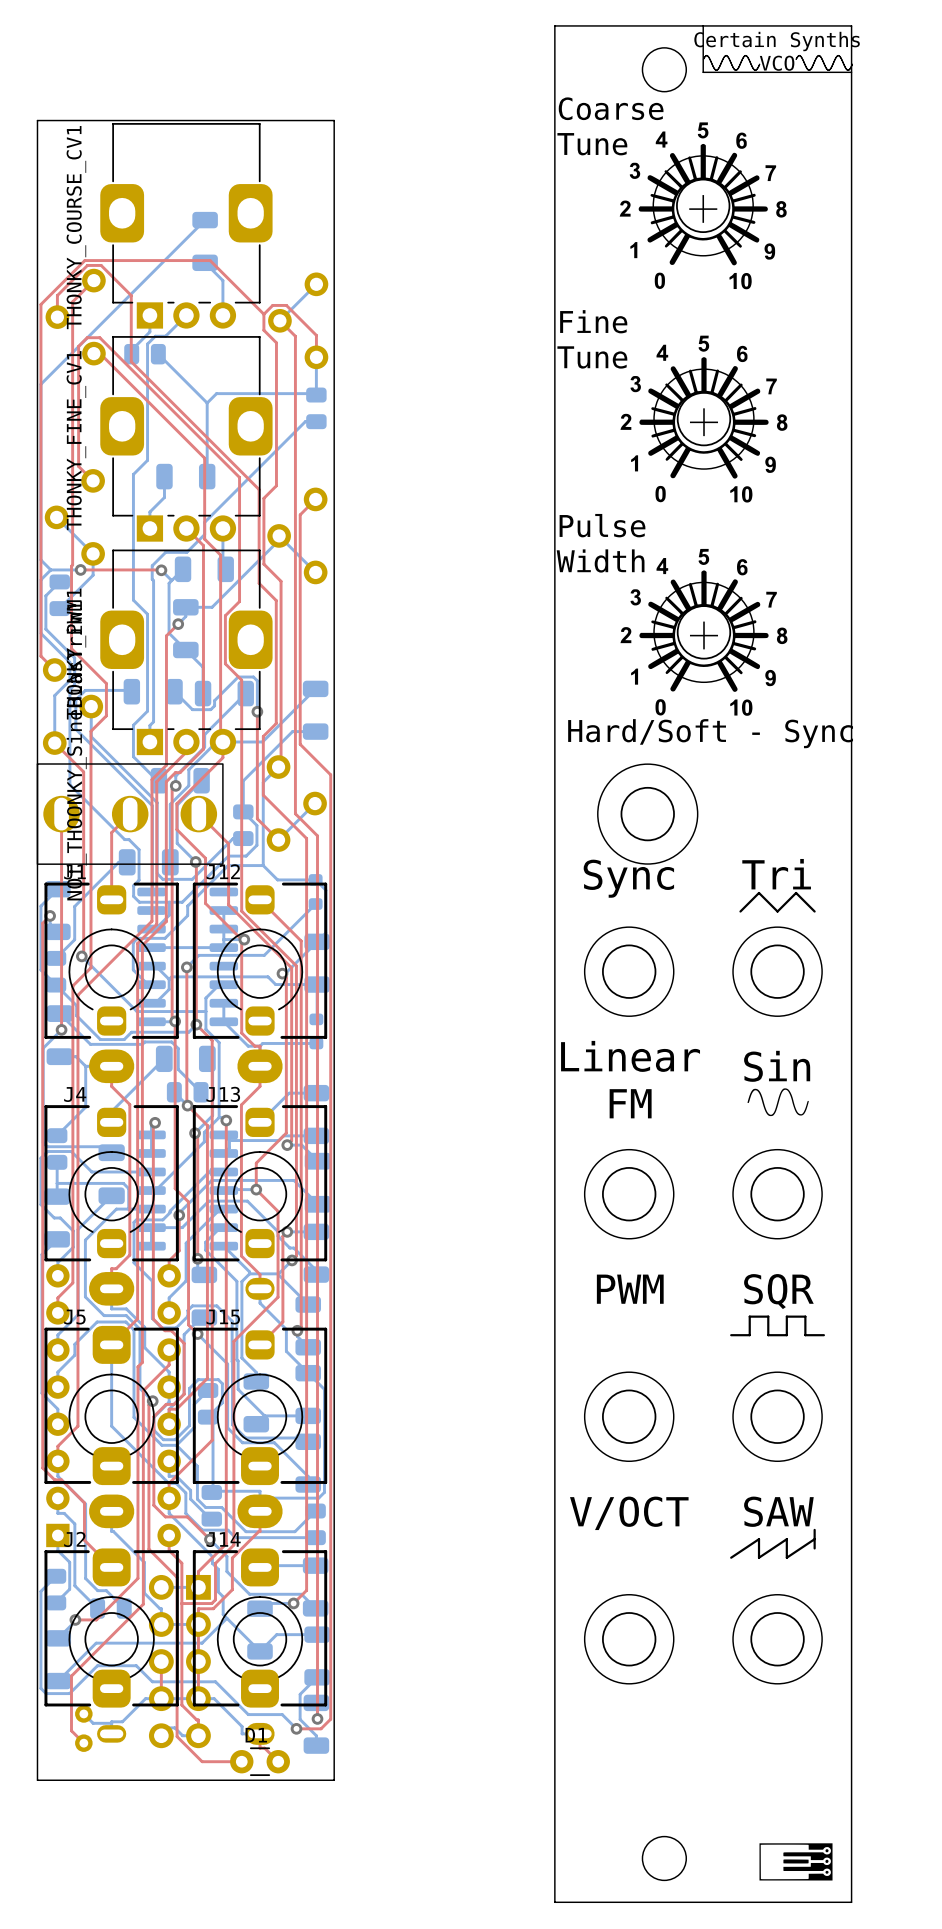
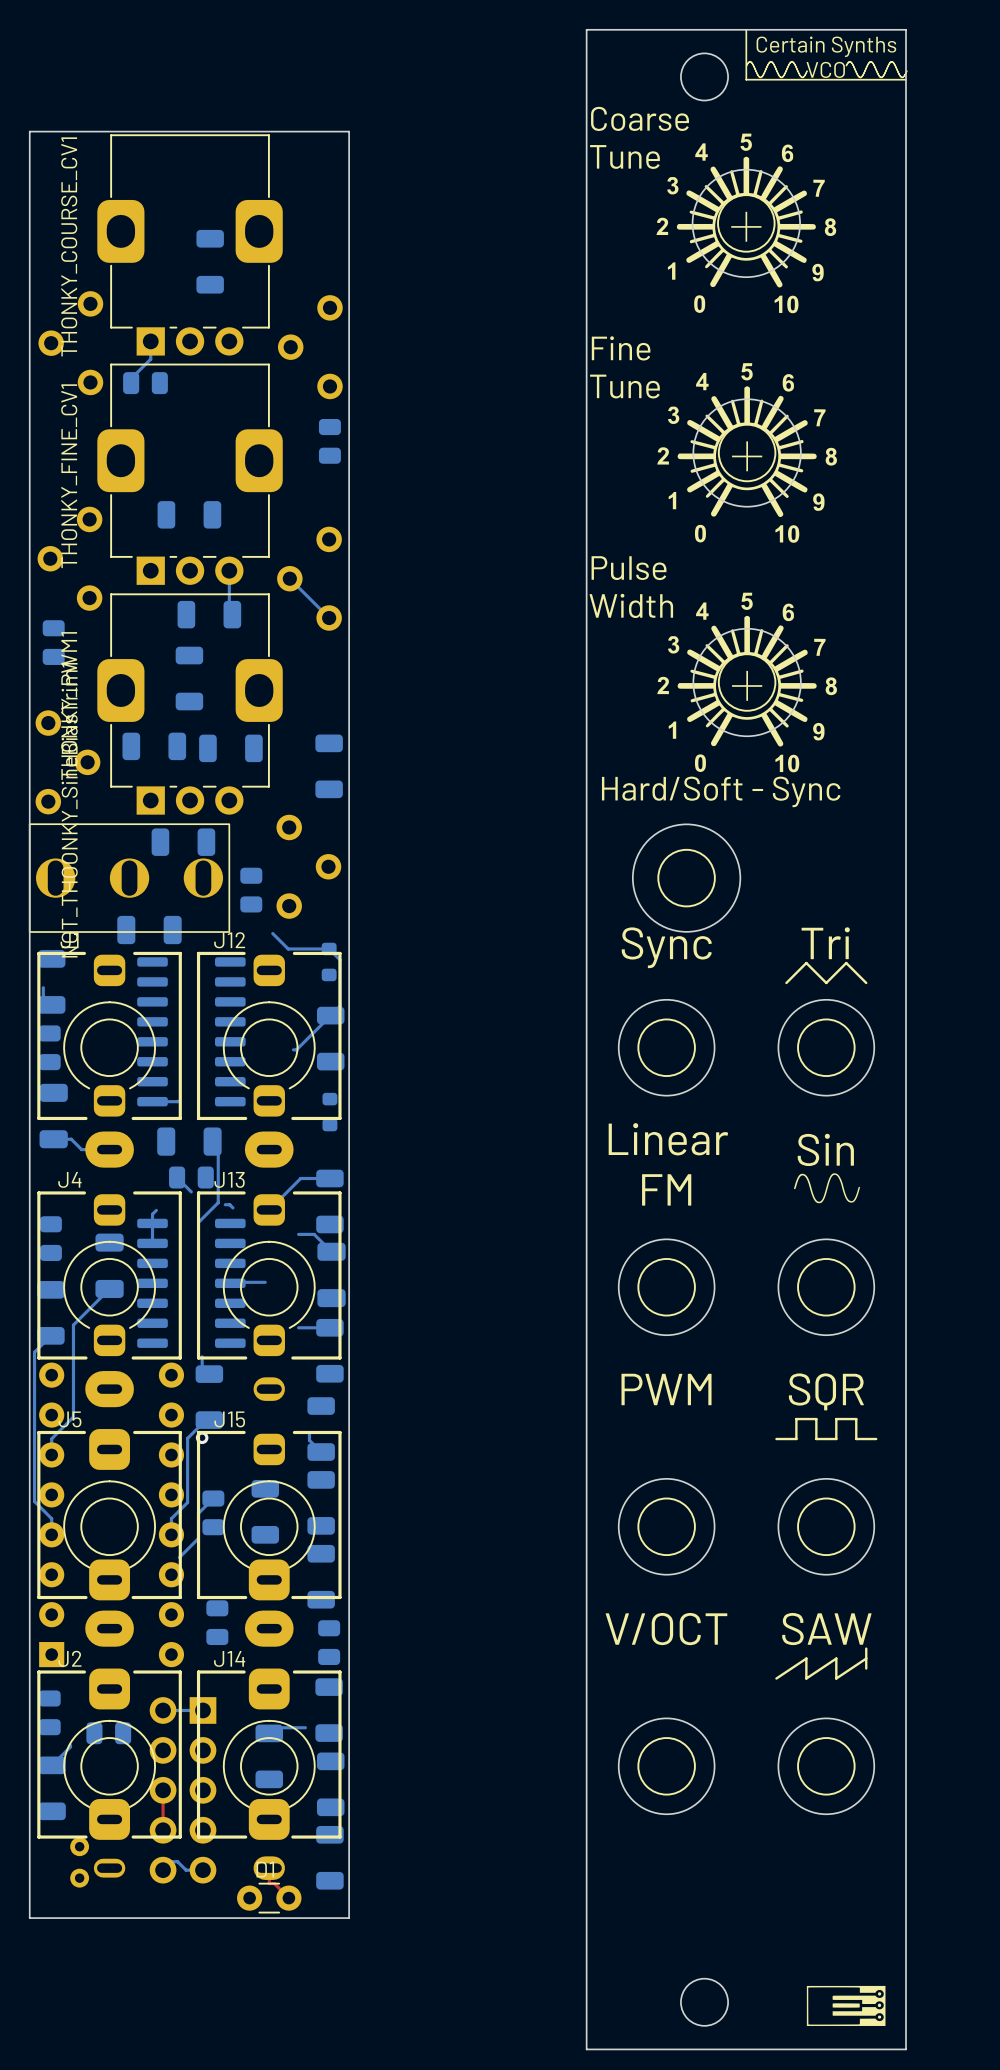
bottom track: (205, 220) (40, 384) (40, 560) (50, 569) -> none
bottom track: (205, 262) (222, 280) (222, 315) -> none
top track: (93, 280) (72, 301) (71, 648) (106, 683) (106, 715) (90, 731) (90, 967) (72, 985) (72, 1282) (57, 1297) (57, 1312) -> none
bottom track: (316, 284) (279, 320) -> none
top track: (263, 314) (263, 330) (276, 342) (276, 485) (263, 498) (263, 564) (281, 581) (281, 764) (278, 767) -> none
top track: (263, 314) (210, 260) (84, 260) (40, 304) (40, 656) (54, 670) -> none
top track: (263, 314) (272, 305) (286, 305) (316, 335) (316, 357) -> none
bottom track: (186, 315) (165, 336) (155, 336) (147, 344) (147, 460) (133, 474) (133, 600) (147, 614) (147, 711) (133, 725) (133, 756) (158, 780) -> none
top track: (57, 317) (57, 295) (87, 265) (101, 265) (131, 295) (131, 361) (259, 489) (259, 583) (276, 600) (276, 723) (263, 736) (263, 795) (306, 838) (306, 1590) (293, 1603) -> none
top track: (279, 320) (295, 336) (295, 813) (317, 835) (317, 1718) -> none
top track: (93, 353) (100, 353) (204, 458) (204, 539) (220, 555) (220, 739) (222, 741) (222, 757) (176, 803) (176, 829) (205, 858) (205, 903) (241, 939) -> none
bottom track: (158, 354) (207, 403) -> none
bottom track: (316, 357) (316, 395) -> none
bottom track: (316, 393) (216, 393) (207, 403) -> none
bottom track: (207, 403) (207, 476) -> none
bottom track: (316, 421) (305, 421) (204, 522) (204, 534) (186, 552) (165, 552) (152, 565) (153, 721) (149, 725) (149, 741) -> none
bottom track: (164, 476) (164, 497) (149, 512) (149, 528) -> none
top track: (93, 480) (78, 466) (78, 346) (87, 337) (99, 337) (239, 477) (239, 601) (225, 615) (225, 663) (241, 680) (241, 911) (296, 965) (296, 1256) (292, 1260) -> none
top track: (315, 499) (300, 514) (300, 744) (330, 774) (330, 1719) (321, 1728) (296, 1728) -> none
bottom track: (56, 517) (93, 553) (93, 575) (59, 608) -> none
top track: (186, 528) (203, 545) (203, 749) (180, 772) (175, 772) (166, 781) (166, 921) (142, 945) (142, 1362) (137, 1366) (137, 1578) (96, 1619) (75, 1619) -> none
bottom track: (279, 535) (279, 540) (212, 607) (185, 607) (185, 616) (178, 624) -> none
bottom track: (50, 569) (80, 569) -> none
bottom track: (50, 569) (41, 579) (41, 633) (69, 662) (69, 680) (54, 695) (54, 743) -> none
top track: (80, 569) (161, 570) -> none
via: (80, 569) -> none
bottom track: (183, 569) (169, 583) (169, 633) (203, 667) (203, 693) -> none
bottom track: (161, 570) (171, 580) -> none
via: (161, 570) -> none
bottom track: (59, 581) (45, 595) (45, 629) (74, 658) (74, 684) (69, 689) (69, 784) (124, 839) (129, 839) (139, 849) (139, 880) (133, 885) (133, 896) (139, 902) (182, 902) (228, 856) (246, 856) (256, 845) (256, 825) (243, 811) (243, 780) (292, 731) (315, 731) -> none
top track: (178, 624) (166, 635) (166, 765) (151, 779) (151, 921) (77, 995) (77, 1426) (57, 1446) (57, 1461) -> none
via: (178, 624) -> none
bottom track: (315, 688) (262, 741) (216, 741) (188, 769) (188, 785) (170, 804) (170, 862) -> none
bottom track: (131, 691) (85, 690) (75, 699) (75, 729) (152, 805) (151, 891) -> none
bottom track: (174, 691) (192, 709) (210, 709) (214, 705) (214, 700) (238, 677) (253, 677) (257, 680) (257, 711) -> none
bottom track: (245, 693) (204, 734) (204, 747) (175, 776) (175, 785) -> none
bottom track: (91, 706) (91, 736) (157, 802) (157, 873) (162, 879) (192, 879) (233, 838) (243, 838) -> none
top track: (257, 711) (257, 818) (278, 840) -> none
via: (257, 711) -> none
top track: (186, 741) (186, 752) (156, 781) (156, 924) (137, 943) (137, 1318) (111, 1344) -> none
top track: (54, 743) (83, 771) (83, 954) (81, 956) -> none
bottom track: (278, 767) (263, 782) (263, 865) (228, 865) (187, 906) (187, 915) (165, 938) (137, 938) (133, 942) (133, 969) (148, 984) (151, 984) -> none
bottom track: (201, 780) (177, 805) (177, 843) (195, 861) -> none
top track: (175, 785) (172, 789) (172, 1018) (175, 1021) (175, 1188) (188, 1202) (188, 1324) (197, 1334) -> none
via: (175, 785) -> none
bottom track: (315, 803) (278, 840) -> none
top track: (61, 814) (61, 1029) -> none
top track: (130, 814) (111, 832) (111, 899) -> none
top track: (198, 814) (228, 843) (228, 904) (291, 967) (291, 1140) (287, 1145) -> none
top track: (195, 861) (196, 1024) (212, 1040) (212, 1440) (169, 1483) (169, 1498) -> none
via: (195, 861) -> none
bottom track: (127, 862) (118, 862) (74, 906) (74, 939) (56, 958) -> none
bottom track: (57, 889) (40, 906) (40, 969) (76, 1005) (76, 1015) (100, 1039) (124, 1039) (131, 1032) (188, 1032) (196, 1024) -> none
top track: (260, 899) (301, 941) (301, 1326) (297, 1330) -> none
bottom track: (169, 902) (169, 915) (155, 929) (151, 929) -> none
bottom track: (315, 904) (264, 955) (198, 955) (186, 967) -> none
bottom track: (223, 910) (223, 947) (151, 947) -> none
top track: (50, 915) (42, 923) (42, 1468) (54, 1479) (61, 1479) (84, 1502) (84, 1540) (111, 1567) -> none
via: (50, 915) -> none
bottom track: (223, 939) (244, 939) -> none
top track: (241, 939) (241, 1033) (254, 1046) (260, 1046) (260, 1086) (241, 1104) (241, 1256) (260, 1274) (260, 1288) -> none
via: (244, 939) -> none
bottom track: (81, 956) (136, 1011) (205, 1011) -> none
via: (81, 956) -> none
bottom track: (151, 966) (155, 966) (169, 979) -> none
top track: (186, 967) (186, 1104) (207, 1125) (207, 1378) (176, 1409) (169, 1409) (169, 1424) -> none
via: (186, 967) -> none
top track: (282, 973) (286, 977) (286, 1133) (256, 1163) (256, 1189) (278, 1211) (278, 1297) (233, 1341) (233, 1544) (215, 1563) (215, 1599) (211, 1603) (181, 1603) -> none
via: (282, 973) -> none
bottom track: (169, 979) (169, 989) (155, 1003) (151, 1003) -> none
bottom track: (169, 979) (171, 976) (268, 976) (275, 984) (317, 984) (316, 1019) -> none
bottom track: (223, 984) (219, 984) (205, 998) (205, 1029) (219, 1042) (219, 1117) (204, 1132) (204, 1141) (155, 1190) (151, 1190) -> none
bottom track: (223, 1003) (223, 1021) (248, 1046) (260, 1046) -> none
bottom track: (59, 1013) (90, 1044) (142, 1044) (144, 1041) (171, 1041) (178, 1048) (178, 1069) (201, 1092) -> none
via: (175, 1021) -> none
via: (196, 1024) -> none
bottom track: (61, 1029) (43, 1048) (43, 1142) (47, 1146) (105, 1146) (111, 1152) -> none
via: (61, 1029) -> none
bottom track: (316, 1043) (262, 1043) (260, 1046) -> none
bottom track: (164, 1058) (111, 1111) (111, 1122) -> none
bottom track: (85, 1066) (85, 1107) (57, 1135) -> none
top track: (111, 1066) (111, 1086) (129, 1104) (129, 1255) (116, 1268) (111, 1268) (111, 1288) -> none
via: (187, 1105) -> none
top track: (226, 1120) (226, 1543) (198, 1571) (198, 1587) -> none
via: (226, 1120) -> none
top track: (155, 1122) (153, 1124) (153, 1319) (165, 1330) (171, 1330) (184, 1343) (184, 1394) (173, 1404) (166, 1404) (153, 1416) (153, 1505) (165, 1516) (187, 1516) (209, 1539) -> none
via: (155, 1122) -> none
top track: (195, 1133) (197, 1135) (197, 1258) -> none
via: (195, 1133) -> none
bottom track: (316, 1135) (283, 1135) (278, 1140) (229, 1140) -> none
bottom track: (229, 1140) (229, 1147) (223, 1153) -> none
via: (287, 1145) -> none
bottom track: (57, 1162) (57, 1196) -> none
bottom track: (151, 1172) (91, 1172) (71, 1151) (47, 1151) (40, 1158) (40, 1204) (54, 1217) (60, 1217) (73, 1231) (73, 1247) (57, 1260) (57, 1275) -> none
bottom track: (223, 1172) (209, 1172) (162, 1219) (136, 1219) (133, 1222) (133, 1262) (152, 1281) (152, 1318) (161, 1327) (176, 1327) (187, 1316) (187, 1310) (192, 1305) (216, 1305) (232, 1321) (232, 1424) (245, 1438) (304, 1438) (308, 1441) -> none
bottom track: (57, 1183) (123, 1183) (128, 1188) (128, 1209) -> none
via: (256, 1189) -> none
bottom track: (317, 1204) (294, 1180) (211, 1180) (179, 1213) (179, 1215) -> none
bottom track: (151, 1209) (116, 1209) (85, 1240) (85, 1296) (104, 1315) (126, 1315) (139, 1329) (139, 1388) (152, 1401) -> none
bottom track: (223, 1209) (220, 1209) (186, 1243) (186, 1280) (169, 1297) (169, 1312) -> none
top track: (179, 1215) (179, 1250) (169, 1260) (169, 1275) -> none
via: (179, 1215) -> none
bottom track: (223, 1227) (220, 1227) (205, 1242) (205, 1250) (236, 1281) (238, 1389) (264, 1415) -> none
top track: (287, 1231) (282, 1236) (282, 1322) (260, 1344) -> none
via: (287, 1231) -> none
bottom track: (151, 1246) (151, 1227) (182, 1227) (208, 1201) (247, 1201) (278, 1231) (278, 1236) (289, 1248) (293, 1248) (316, 1270) (316, 1274) -> none
bottom track: (223, 1246) (249, 1273) -> none
via: (197, 1258) -> none
bottom track: (292, 1260) (278, 1273) -> none
via: (292, 1260) -> none
bottom track: (249, 1273) (241, 1281) (241, 1358) (256, 1372) (256, 1381) -> none
bottom track: (249, 1273) (278, 1273) -> none
bottom track: (278, 1273) (308, 1304) -> none
bottom track: (111, 1288) (111, 1308) (126, 1308) (144, 1327) (144, 1347) (169, 1372) (169, 1402) (153, 1417) (153, 1430) (163, 1439) (175, 1439) (189, 1425) (189, 1388) (198, 1379) (218, 1379) (222, 1383) (222, 1402) (208, 1417) (213, 1422) (213, 1491) -> none
bottom track: (260, 1288) (260, 1303) (286, 1329) (286, 1351) (324, 1389) (324, 1492) (318, 1498) (260, 1498) -> none
via: (297, 1330) -> none
bottom track: (197, 1334) (227, 1364) (227, 1427) (242, 1442) (274, 1442) (308, 1476) (308, 1484) -> none
bottom track: (111, 1344) (111, 1426) (168, 1483) (176, 1483) (185, 1493) (185, 1513) (202, 1530) (227, 1530) (235, 1537) (315, 1537) -> none
top track: (169, 1350) (169, 1365) (143, 1390) (143, 1604) (71, 1676) (71, 1730) (83, 1743) -> none
bottom track: (57, 1387) (57, 1372) (74, 1355) (74, 1344) (97, 1322) (125, 1322) (133, 1330) (133, 1417) (161, 1445) (176, 1445) (197, 1466) (197, 1499) (205, 1507) (221, 1507) (245, 1531) (294, 1531) (315, 1511) -> none
top track: (152, 1401) (148, 1404) (148, 1549) (177, 1577) (177, 1736) (202, 1761) (241, 1761) -> none
via: (152, 1401) -> none
bottom track: (264, 1415) (308, 1415) -> none
bottom track: (57, 1461) (57, 1476) (85, 1504) (85, 1578) (97, 1590) (106, 1590) (124, 1608) -> none
bottom track: (169, 1461) (169, 1476) (176, 1476) (190, 1490) (190, 1499) (211, 1519) -> none
bottom track: (213, 1491) (260, 1491) (260, 1511) -> none
bottom track: (57, 1498) (57, 1513) (64, 1513) (74, 1523) (74, 1585) (97, 1608) -> none
bottom track: (169, 1498) (169, 1513) (212, 1556) (212, 1563) (218, 1569) (218, 1591) (223, 1596) (223, 1614) (226, 1618) -> none
bottom track: (111, 1511) (111, 1531) (144, 1562) (144, 1593) (161, 1608) (161, 1624) (198, 1624) -> none
top track: (260, 1511) (260, 1531) (232, 1558) (232, 1589) (213, 1608) (198, 1608) (198, 1698) -> none
bottom track: (57, 1535) (57, 1550) (69, 1562) (69, 1589) (56, 1602) -> none
top track: (169, 1535) (169, 1550) (181, 1563) (181, 1705) (198, 1720) (198, 1735) -> none
bottom track: (209, 1539) (226, 1556) (226, 1571) (249, 1594) (301, 1594) (315, 1608) -> none
via: (209, 1539) -> none
bottom track: (315, 1565) (261, 1565) (260, 1567) -> none
bottom track: (56, 1576) (40, 1591) (40, 1688) (46, 1693) (69, 1693) (97, 1665) (136, 1665) (152, 1681) (215, 1681) (248, 1714) (282, 1714) (296, 1728) -> none
via: (293, 1603) -> none
bottom track: (226, 1618) (260, 1651) (276, 1634) (317, 1634) -> none
bottom track: (226, 1618) (202, 1643) (96, 1643) (58, 1681) -> none
via: (75, 1619) -> none
bottom track: (317, 1677) (300, 1694) (300, 1719) (316, 1735) (316, 1745) -> none
bottom track: (83, 1713) (93, 1723) (111, 1723) -> none
via: (317, 1718) -> none
via: (296, 1728) -> none
bottom track: (111, 1733) (111, 1721) (122, 1721) (145, 1698) (214, 1698) (242, 1726) (242, 1733) (260, 1733) -> none

